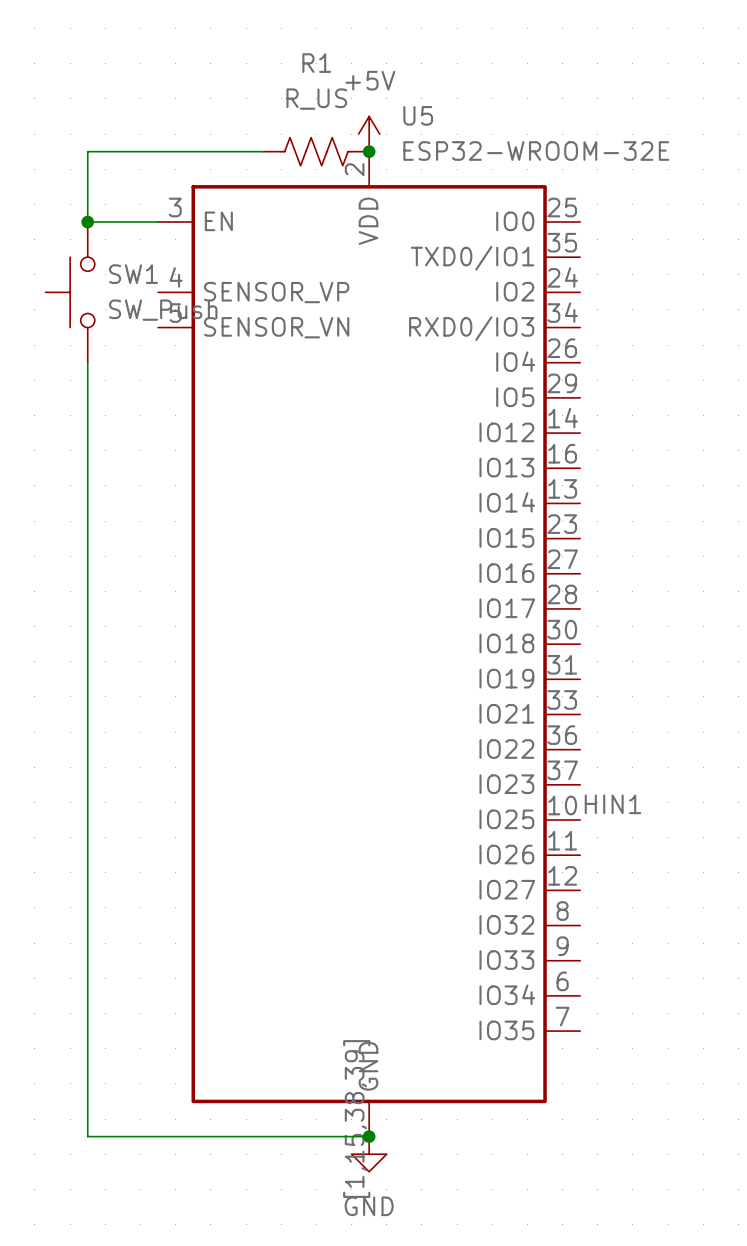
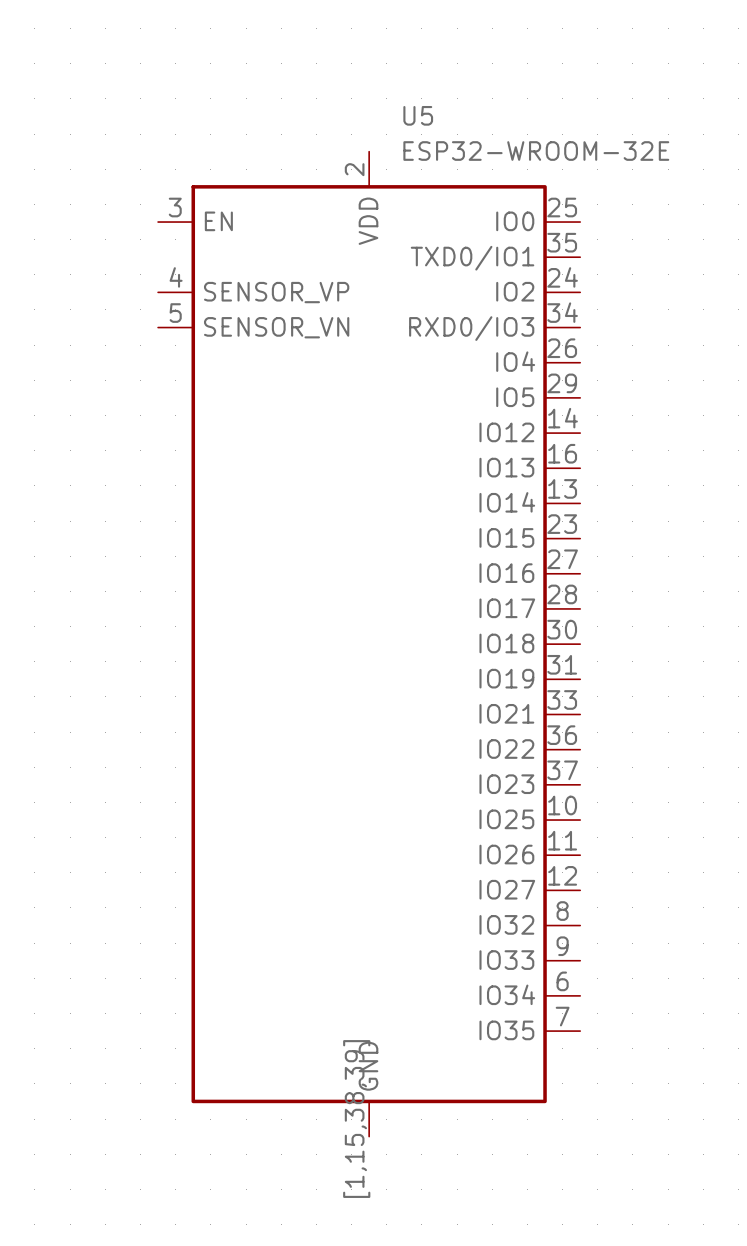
power symbol: +5V (369, 134) -> none
wire: (263, 151) (87, 151) (87, 222) (158, 222) -> none
R1: R_US (316, 151) -> none
junction: (369, 151) -> none
junction: (87, 222) -> none
SW1: SW_Push (70, 292) -> none
wire: (87, 362) (87, 1136) (369, 1136) -> none
label: HIN1 (613, 804) -> none
junction: (369, 1136) -> none
power symbol: GND (369, 1154) -> none

